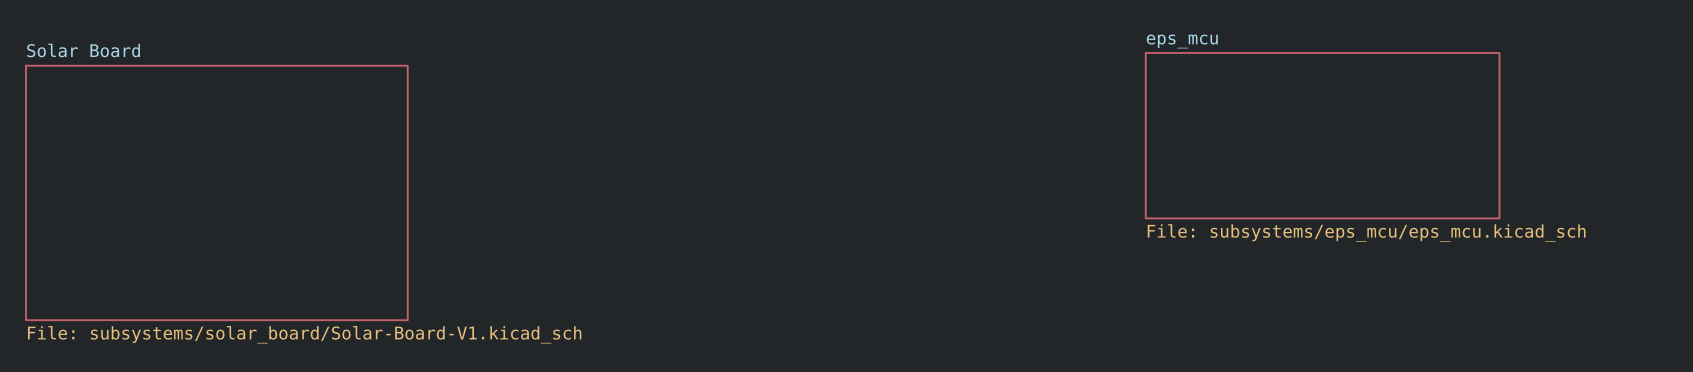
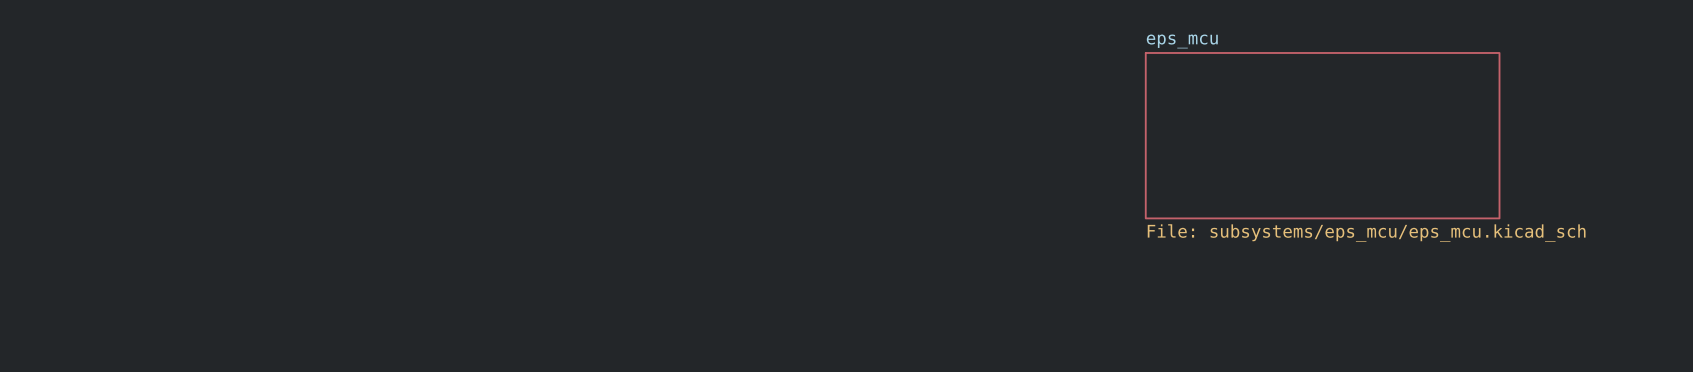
sheet Solar Board: File: subsystems/solar_board/Solar-Board-V1.kicad_sch (216, 192) -> none

